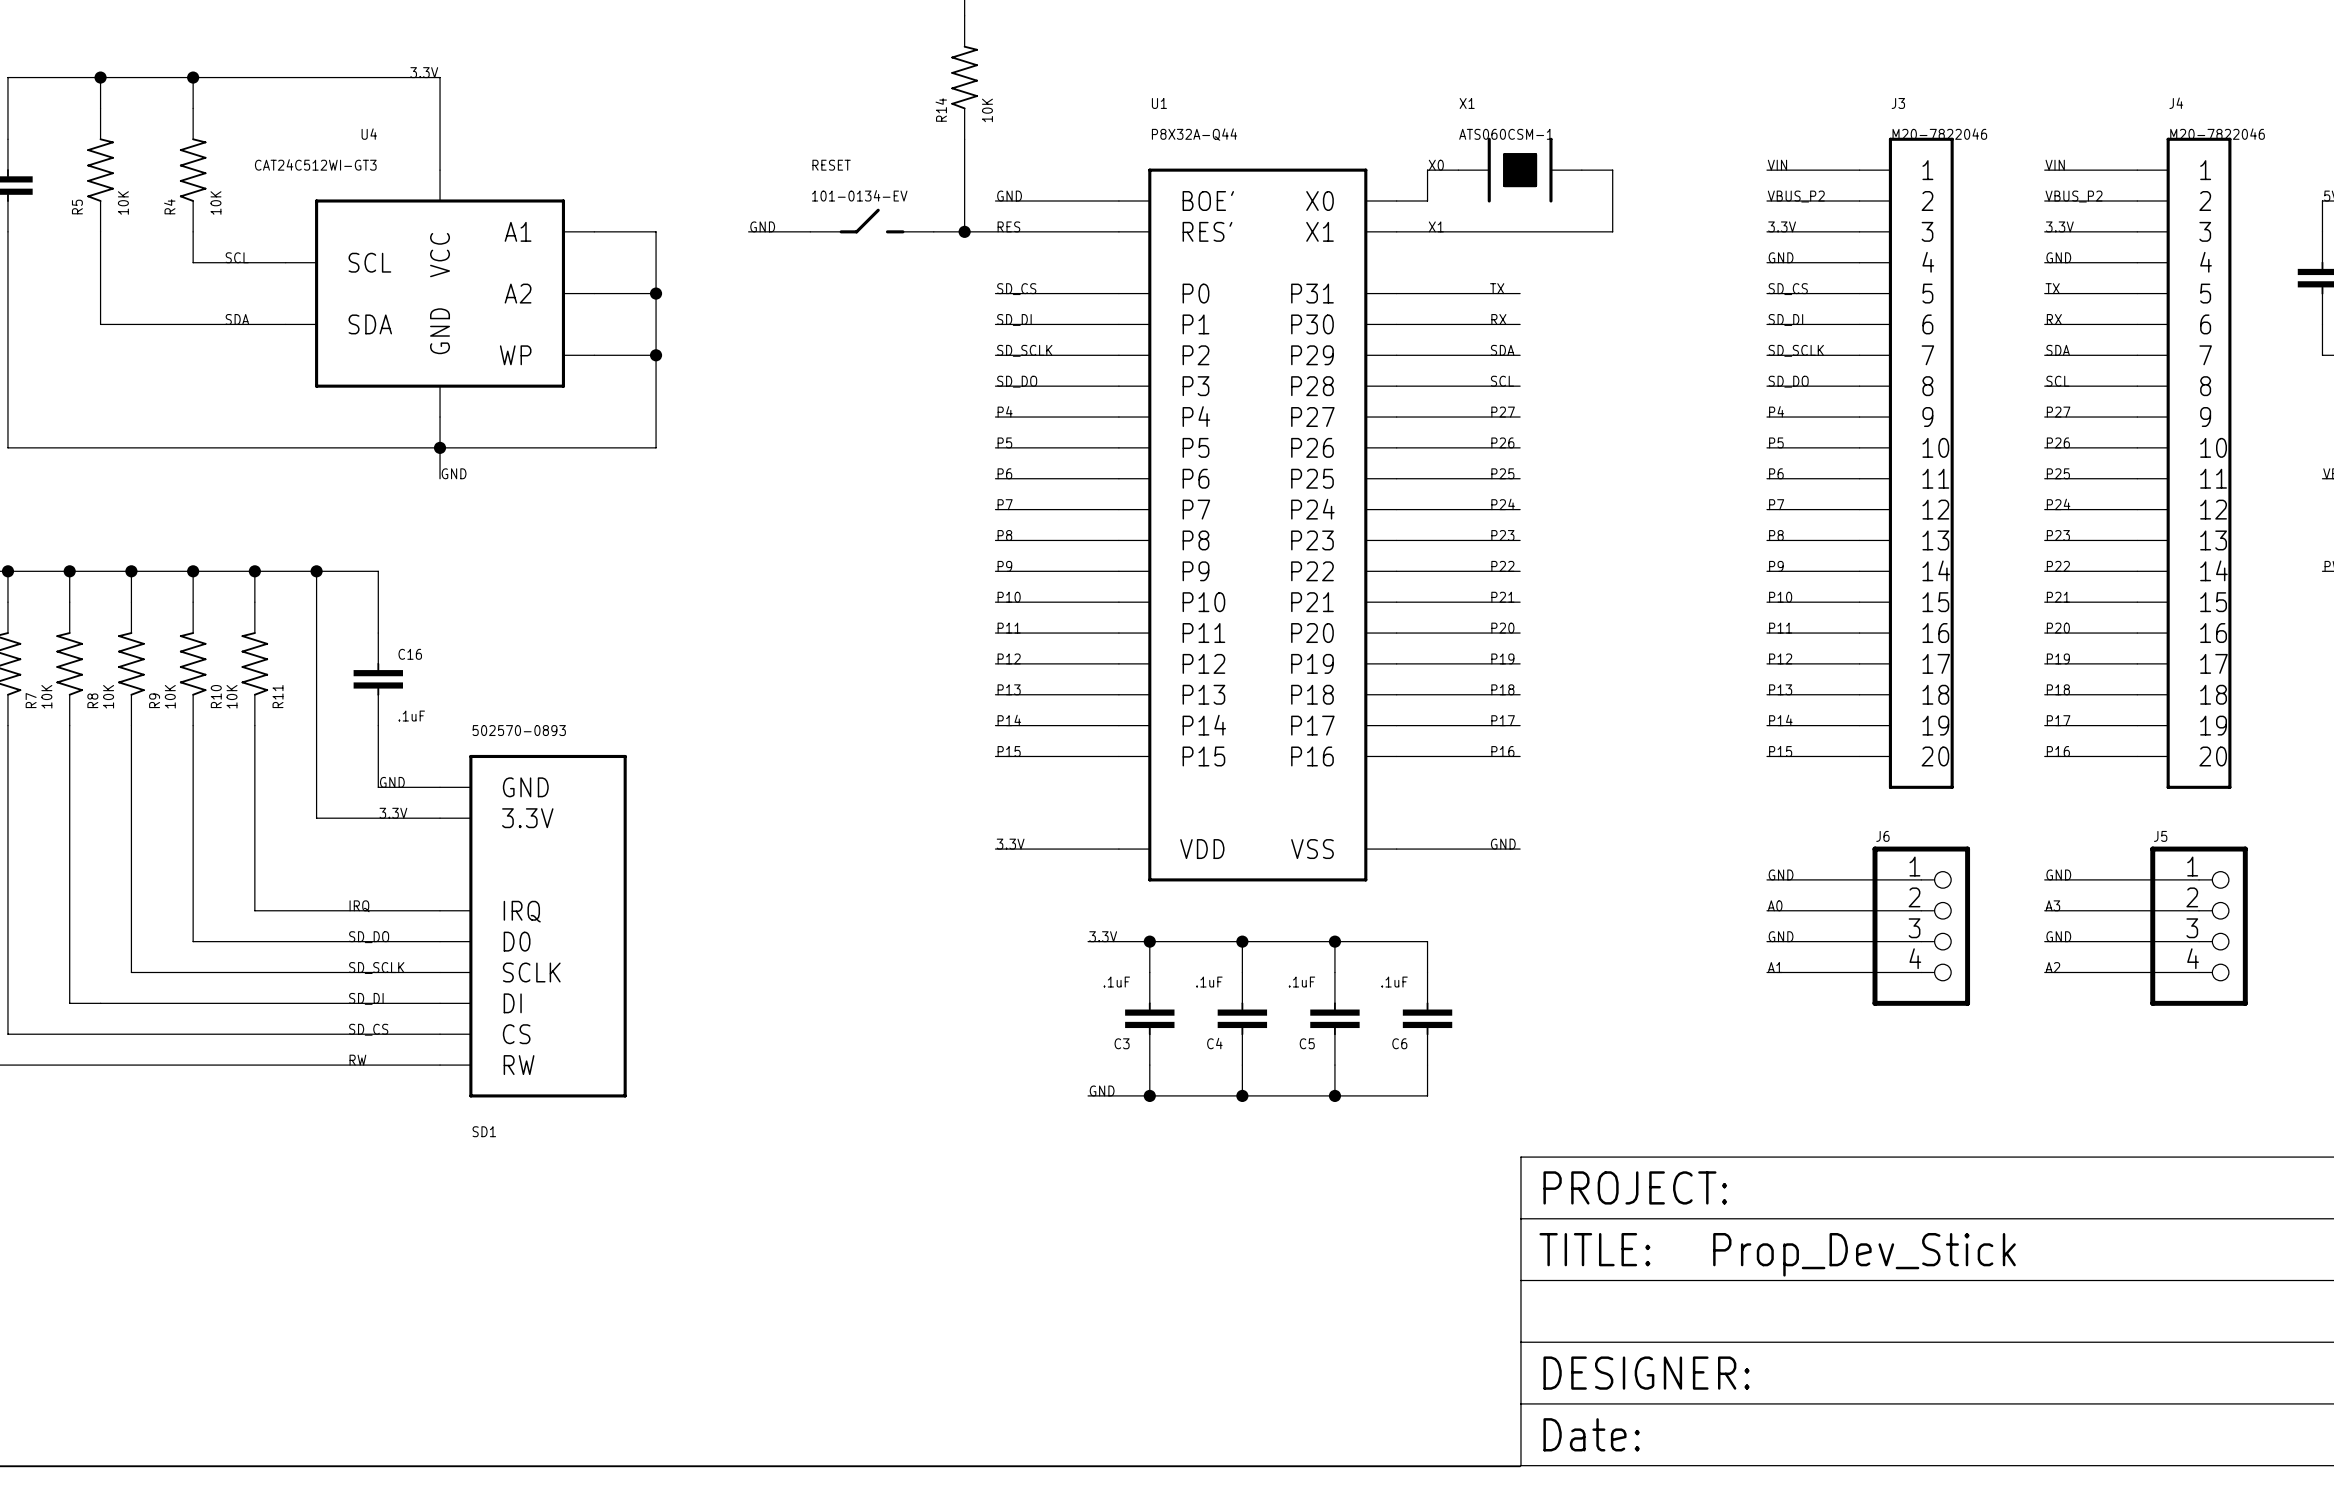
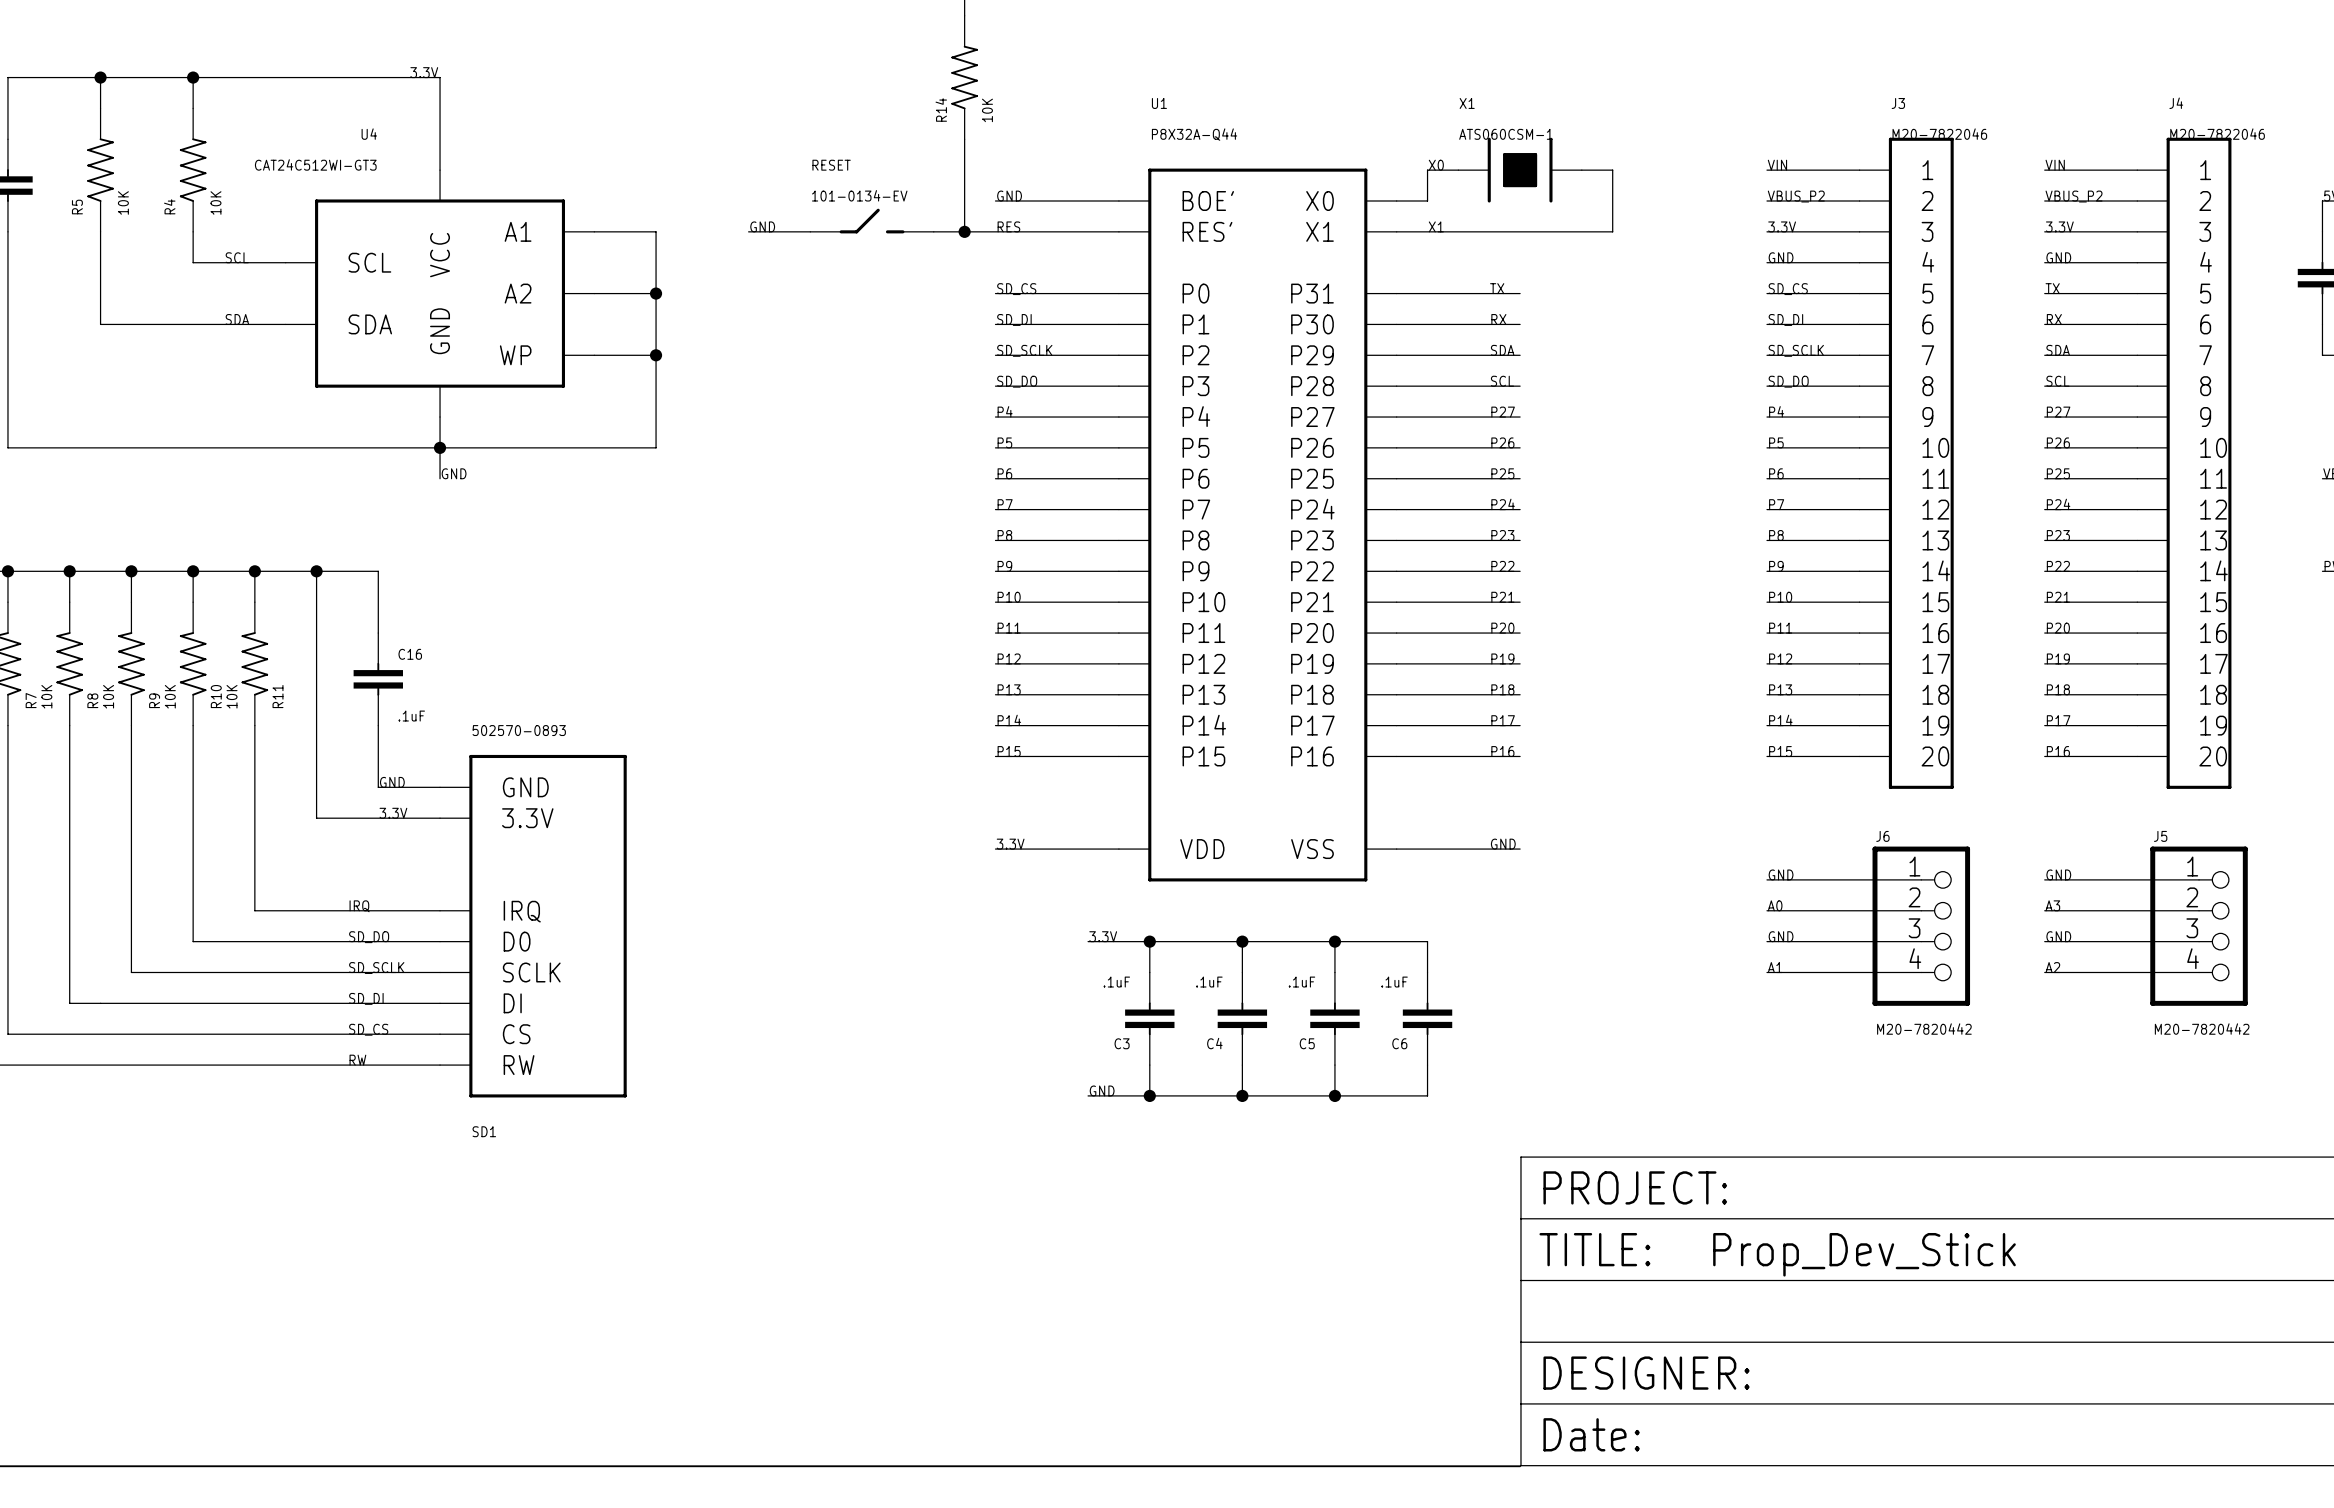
J6 value: none -> M20-7820442 (1924, 1029)
J5 value: none -> M20-7820442 (2202, 1029)

